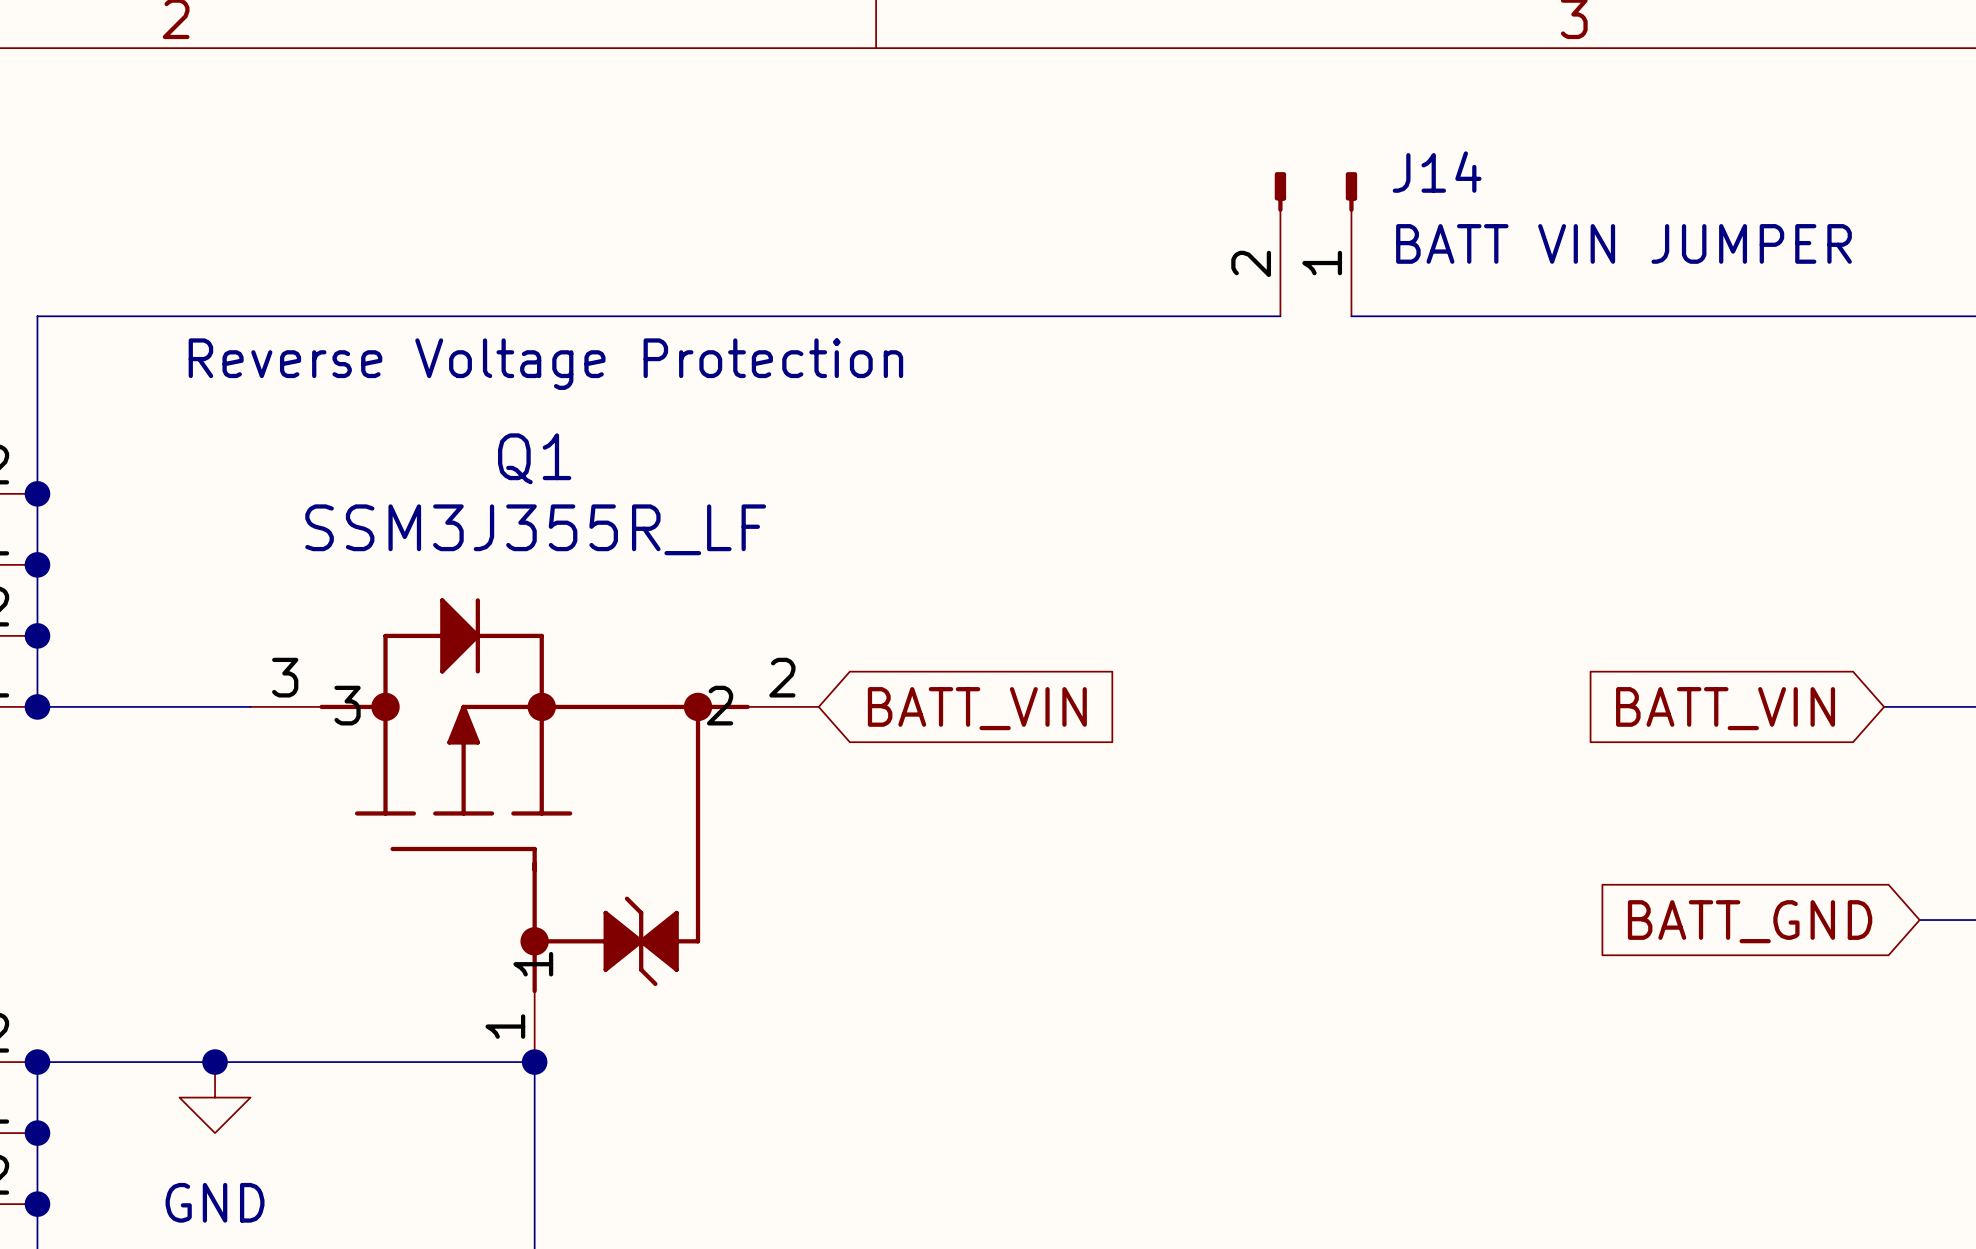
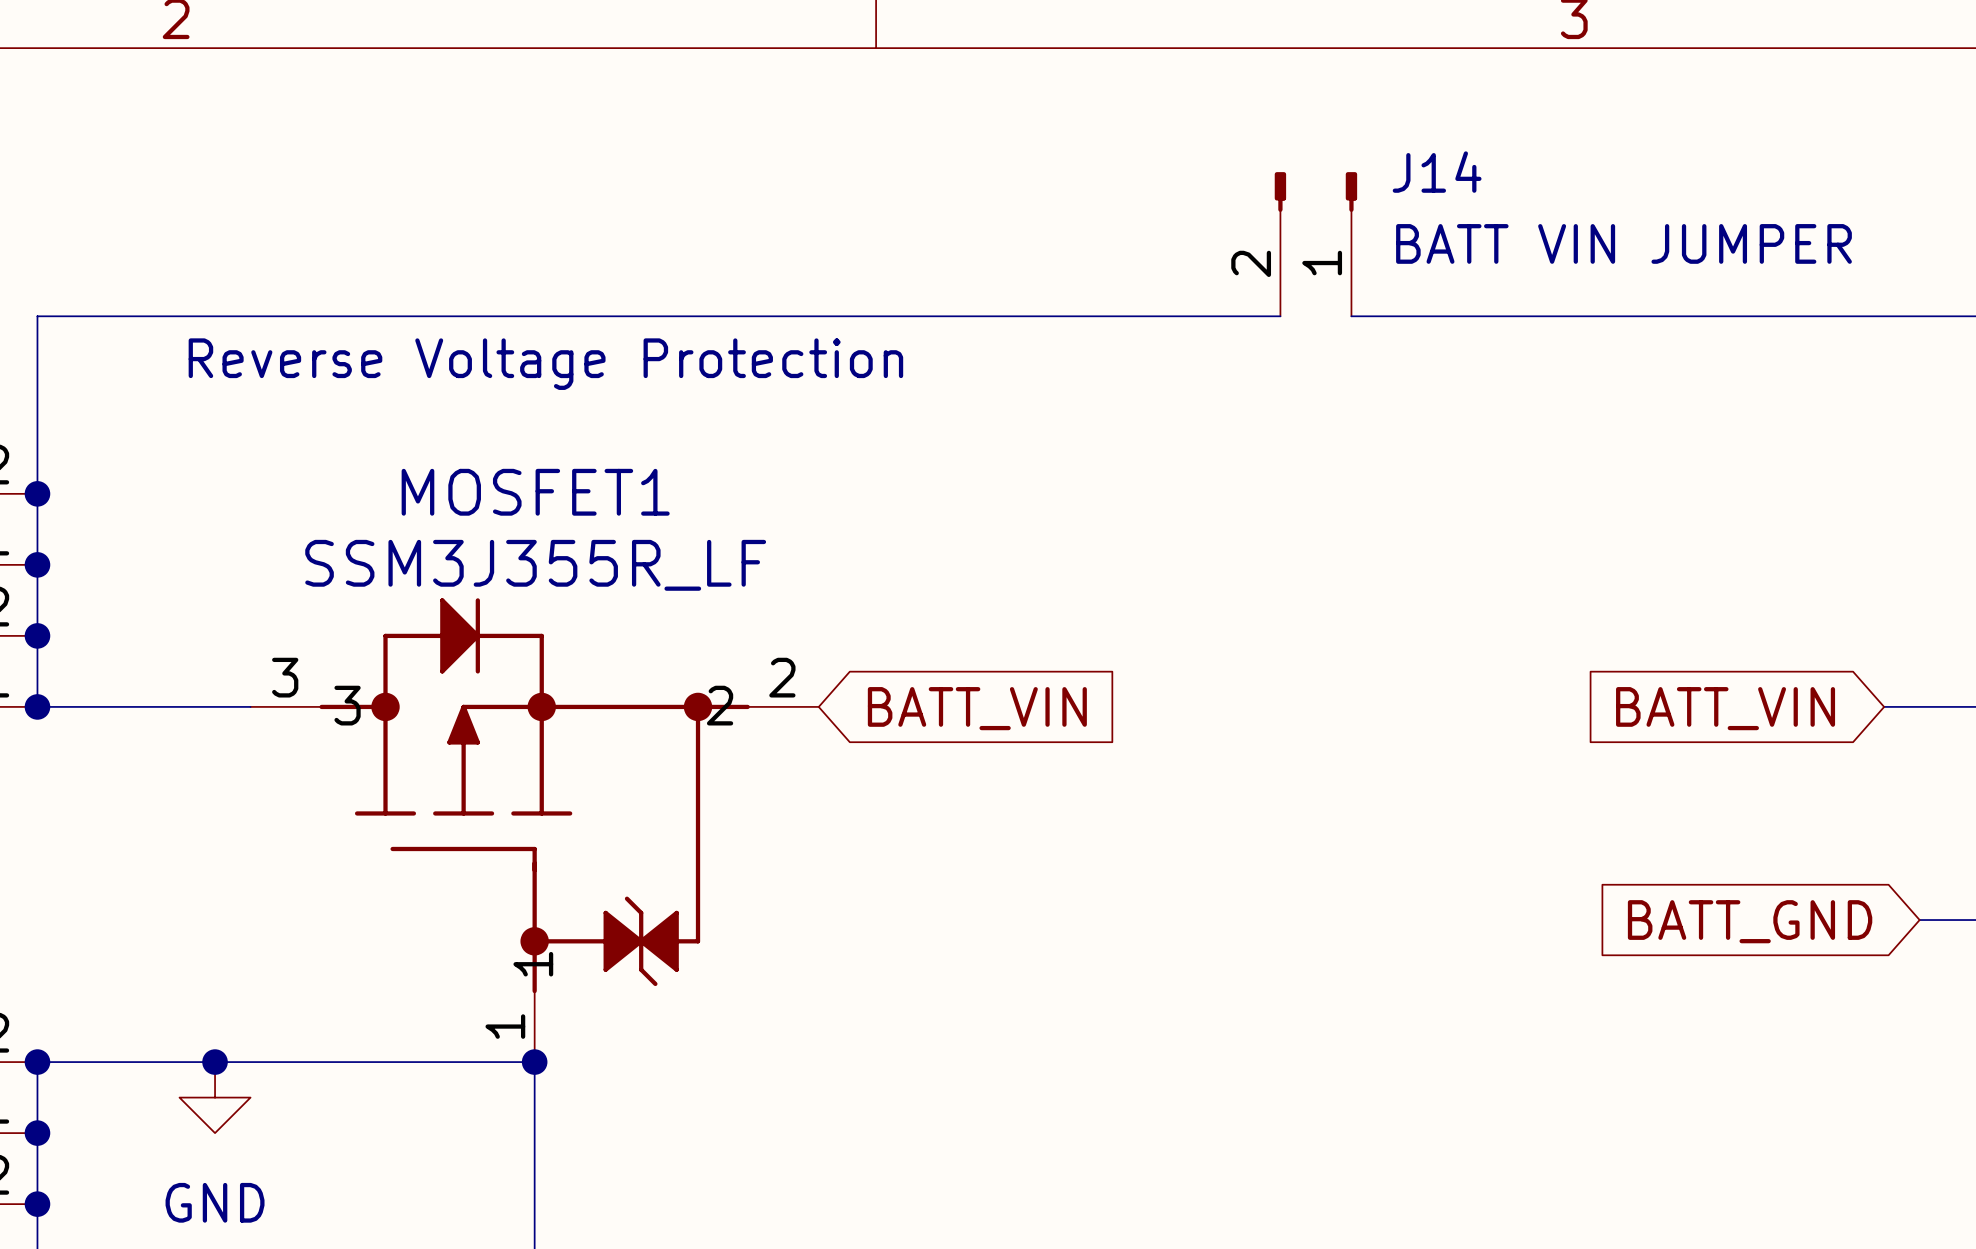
Q1 name: Q1 (534, 458) -> MOSFET1 (535, 492)
Q1 value position: SSM3J355R_LF (535, 529) -> SSM3J355R_LF (535, 565)

